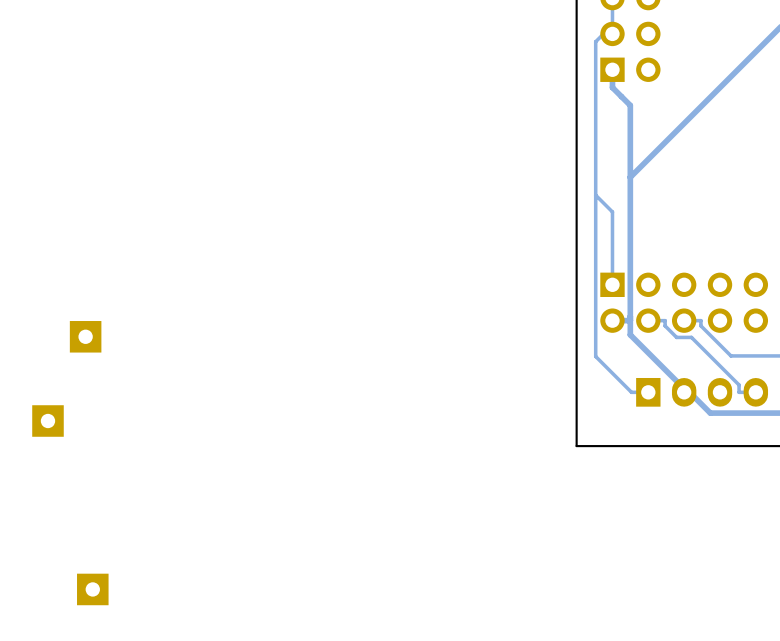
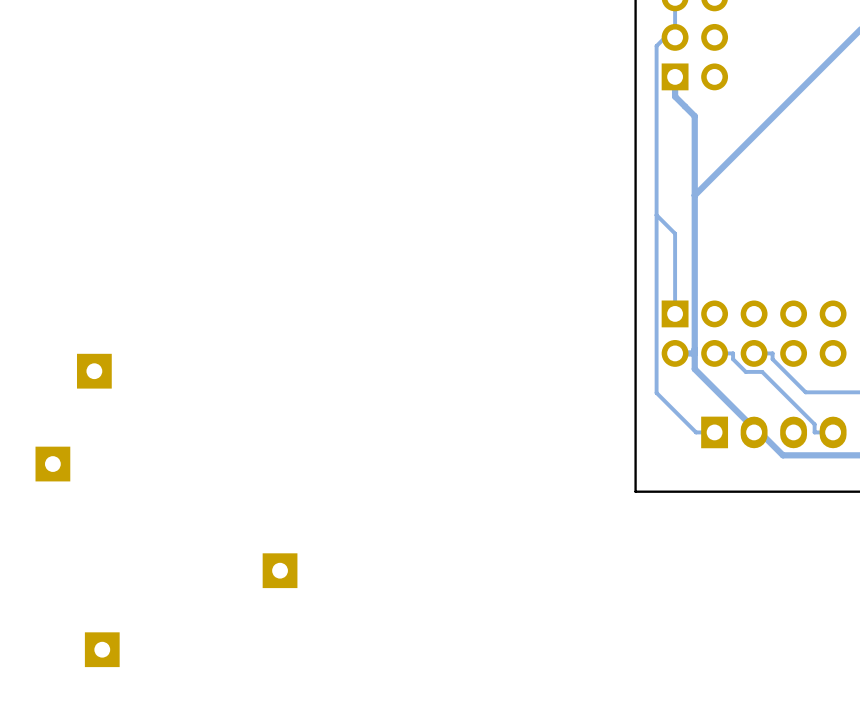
part: none -> (280, 570)

